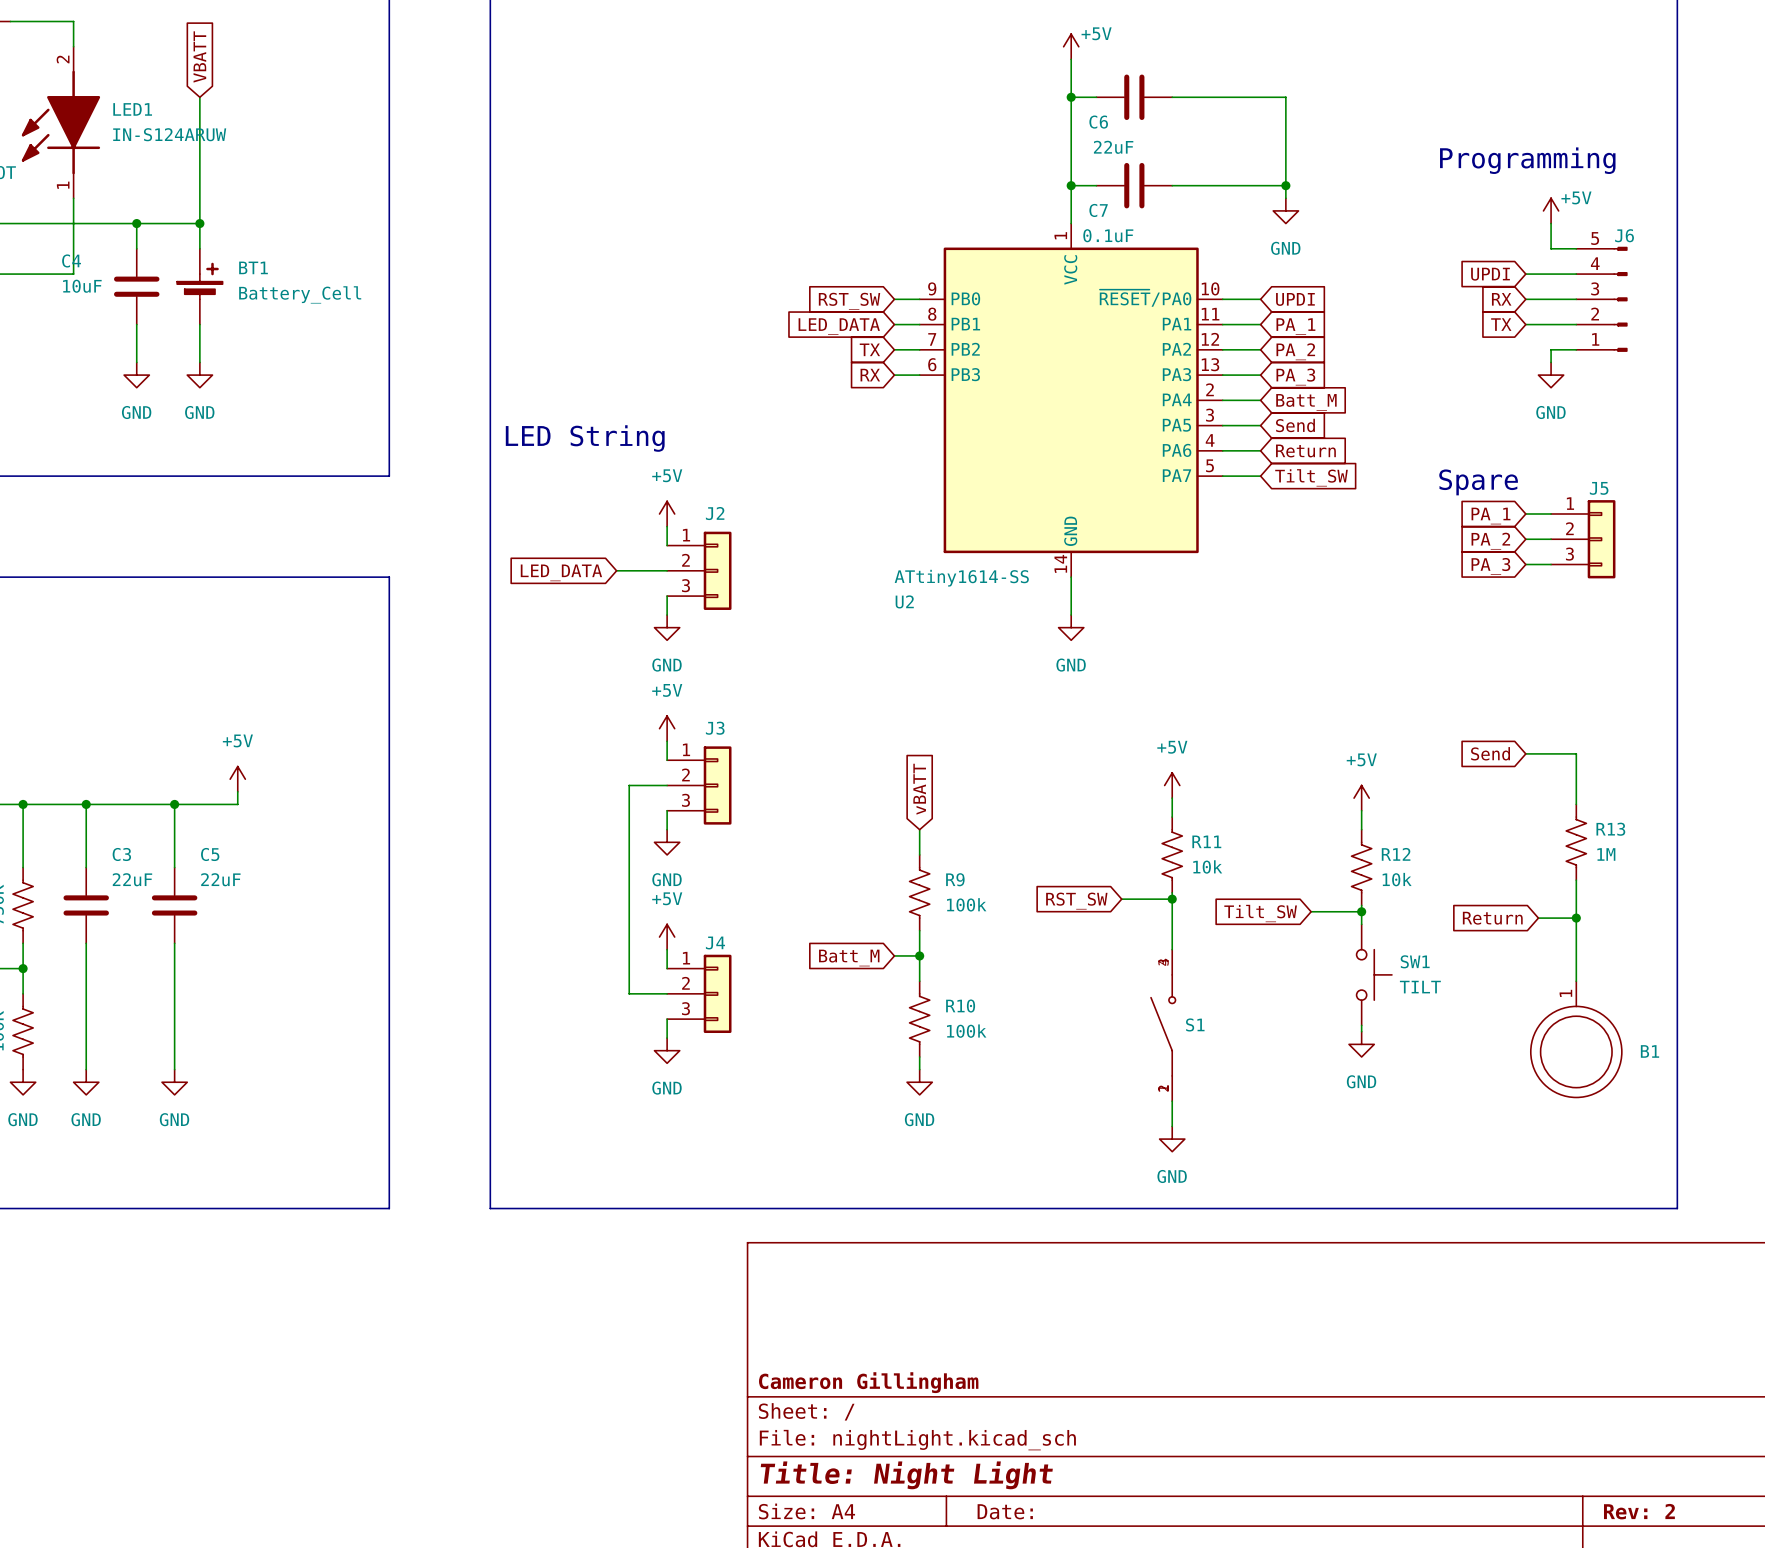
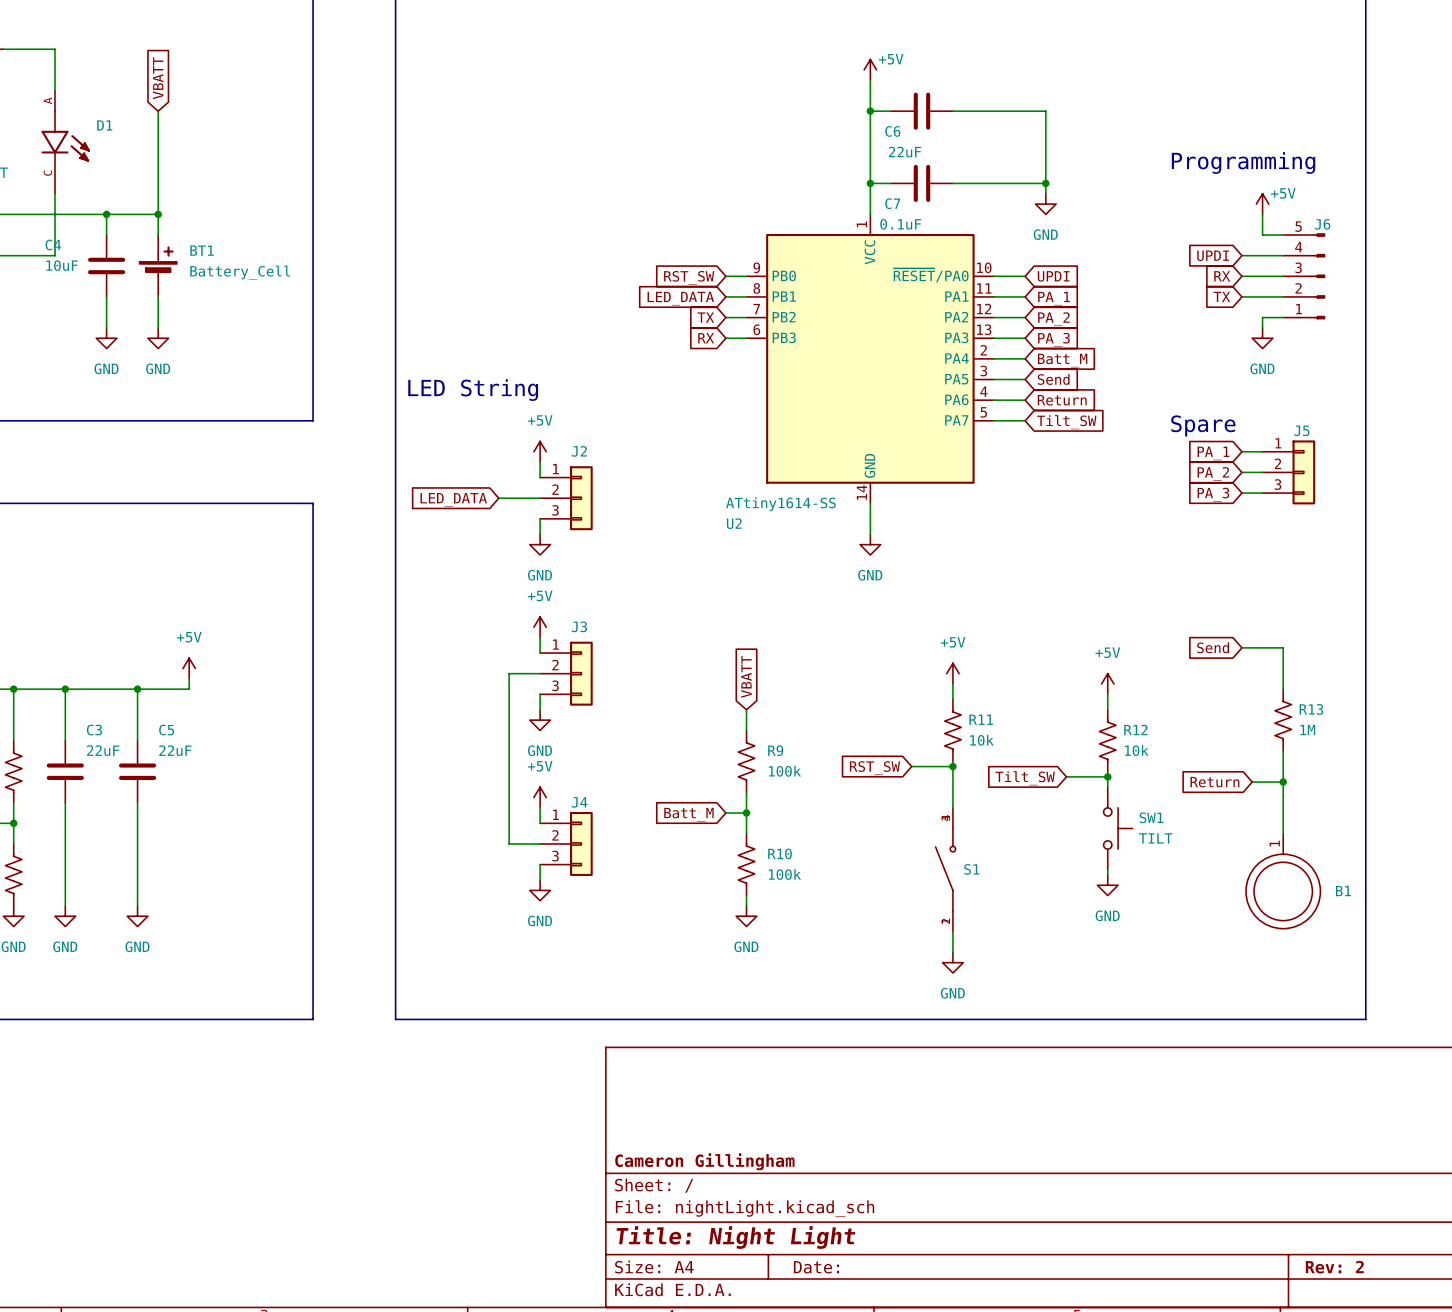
LED1: IN-S124ARUW (60, 122) -> none
D1: none -> (65, 142)
global label: vBATT (919, 789) -> VBATT (746, 676)

